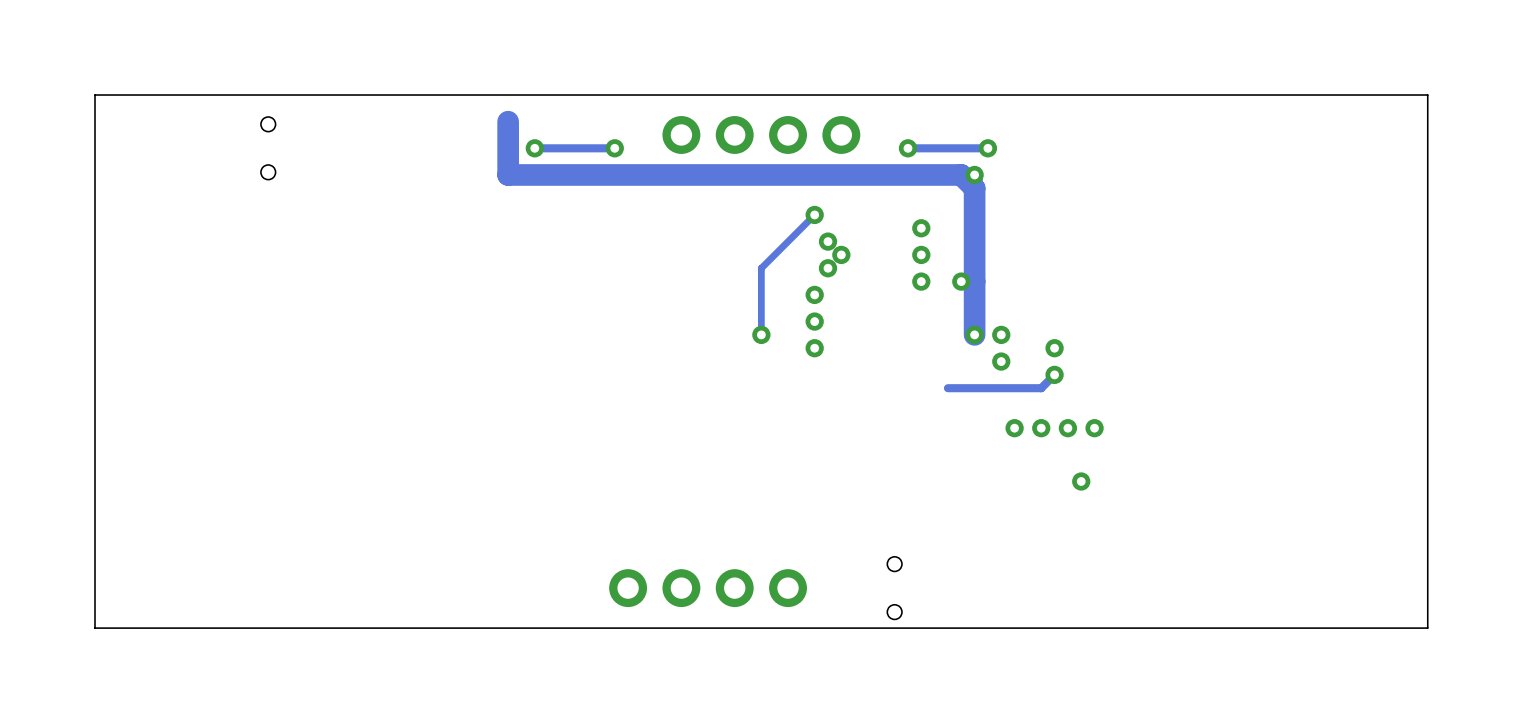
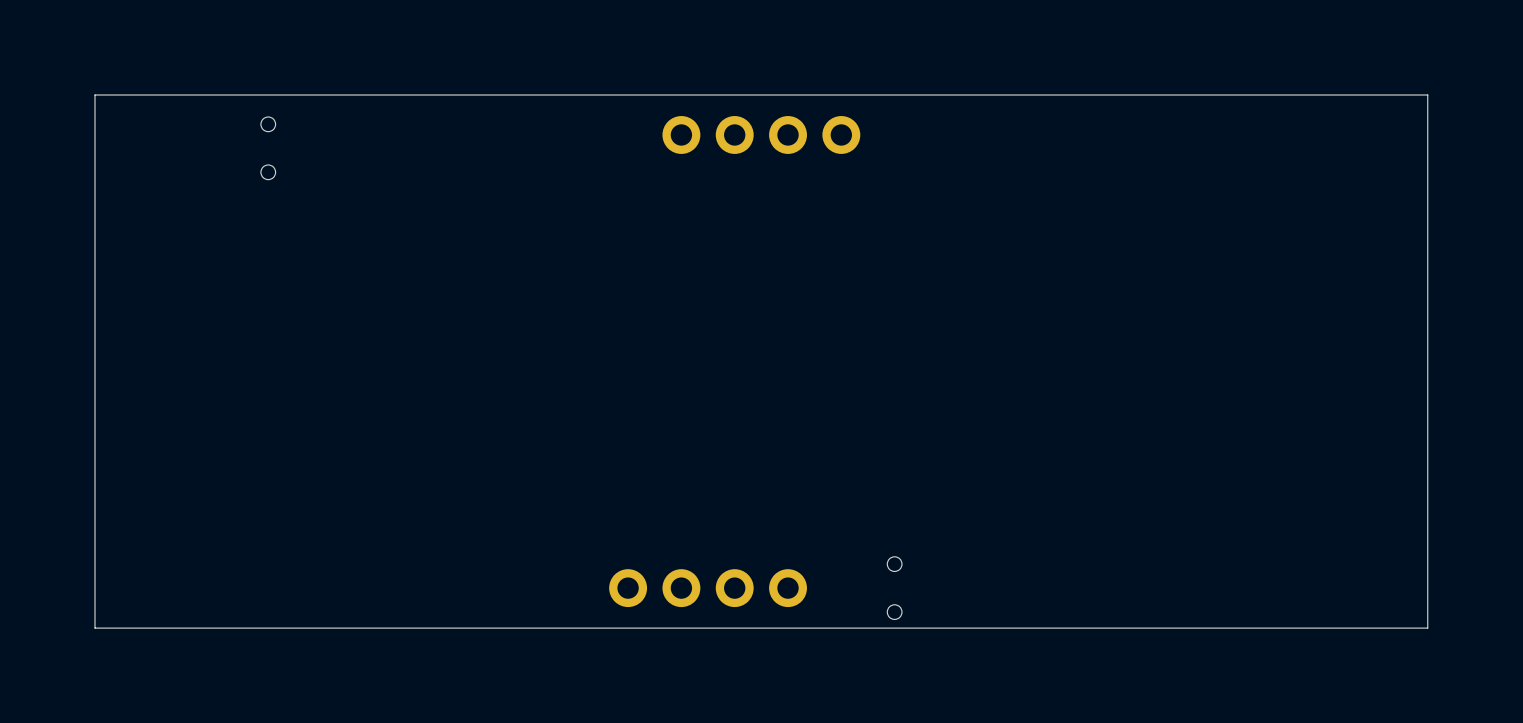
track: (508, 121) (508, 174) (961, 174) (974, 188) -> none
via: (534, 148) -> none
track: (614, 148) (534, 148) -> none
via: (614, 148) -> none
via: (907, 148) -> none
track: (987, 148) (907, 148) -> none
via: (987, 148) -> none
via: (974, 174) -> none
track: (974, 188) (974, 334) -> none
track: (814, 214) (761, 268) (761, 334) -> none
via: (814, 214) -> none
via: (921, 228) -> none
via: (828, 241) -> none
via: (841, 254) -> none
via: (921, 254) -> none
via: (828, 268) -> none
via: (921, 281) -> none
via: (961, 281) -> none
via: (814, 294) -> none
via: (814, 321) -> none
via: (761, 334) -> none
via: (974, 334) -> none
via: (1001, 334) -> none
via: (814, 348) -> none
via: (1054, 348) -> none
via: (1001, 361) -> none
track: (1054, 374) (1041, 388) (947, 388) -> none
via: (1054, 374) -> none
via: (1014, 428) -> none
via: (1041, 428) -> none
via: (1067, 428) -> none
via: (1094, 428) -> none
via: (1081, 481) -> none

